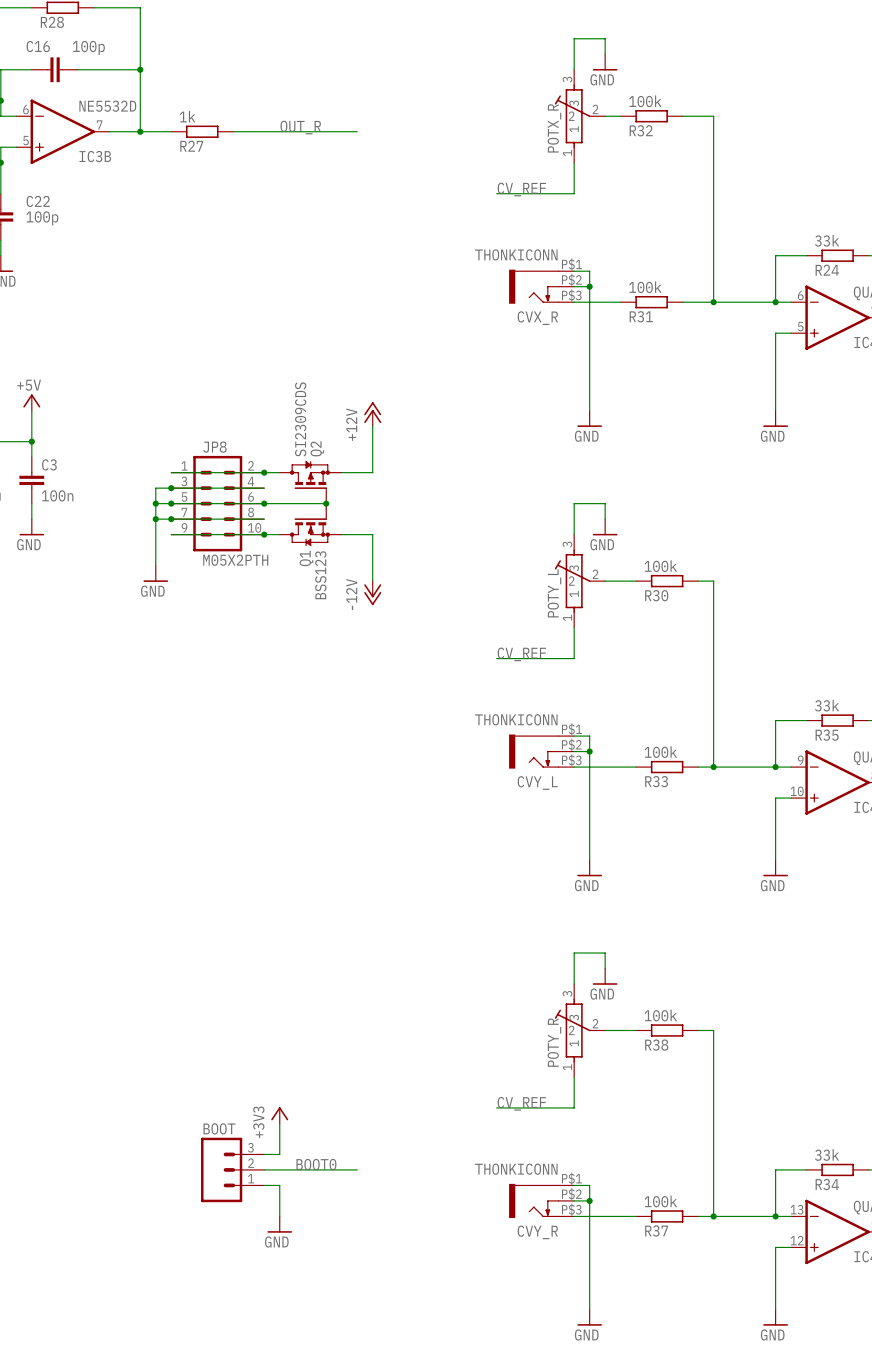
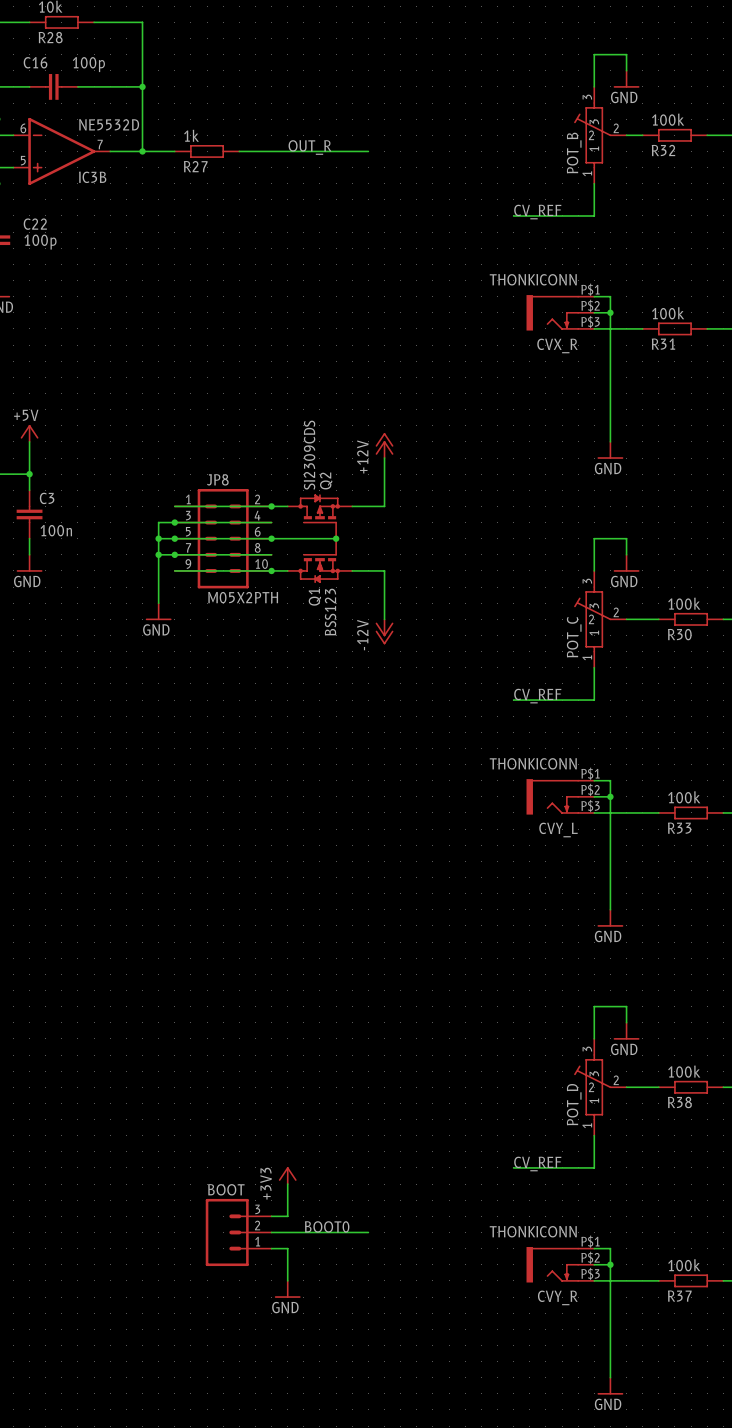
POTX_R name: POTX_R (554, 128) -> POT_B (574, 153)
POTY_L name: POTY_L (554, 593) -> POT_C (574, 637)
POTY_R name: POTY_R (554, 1042) -> POT_D (574, 1104)

